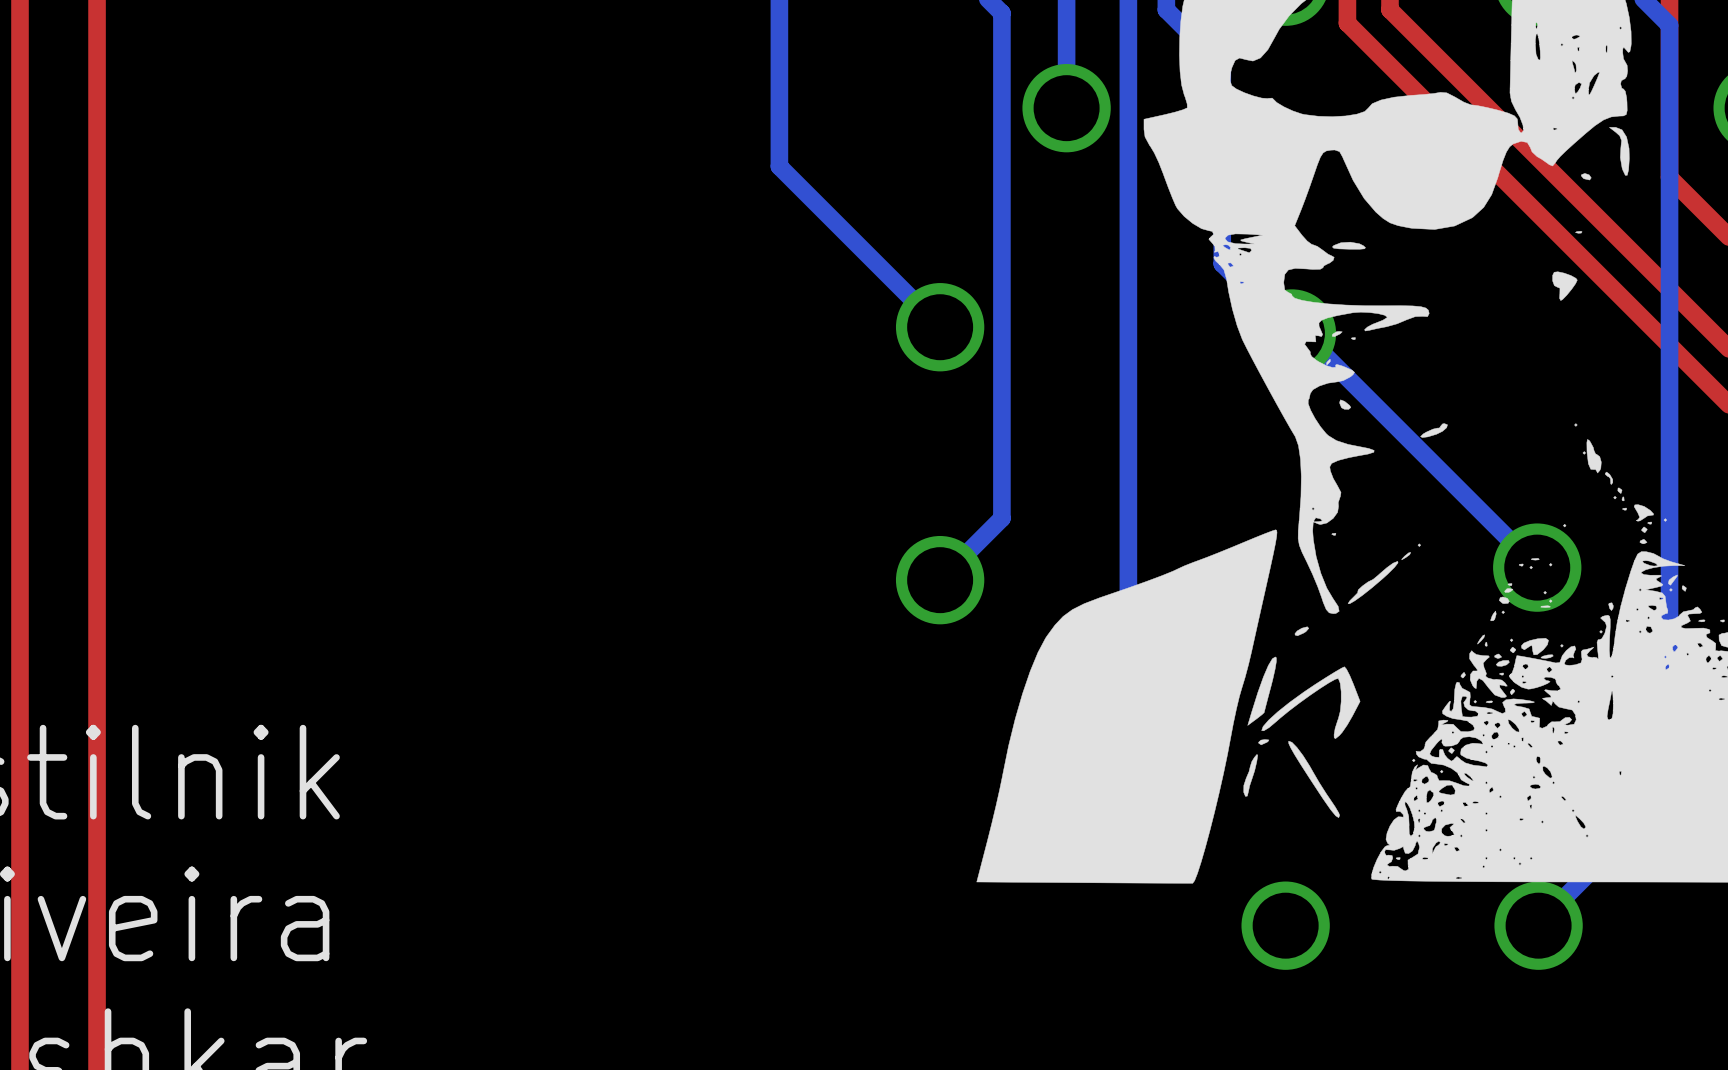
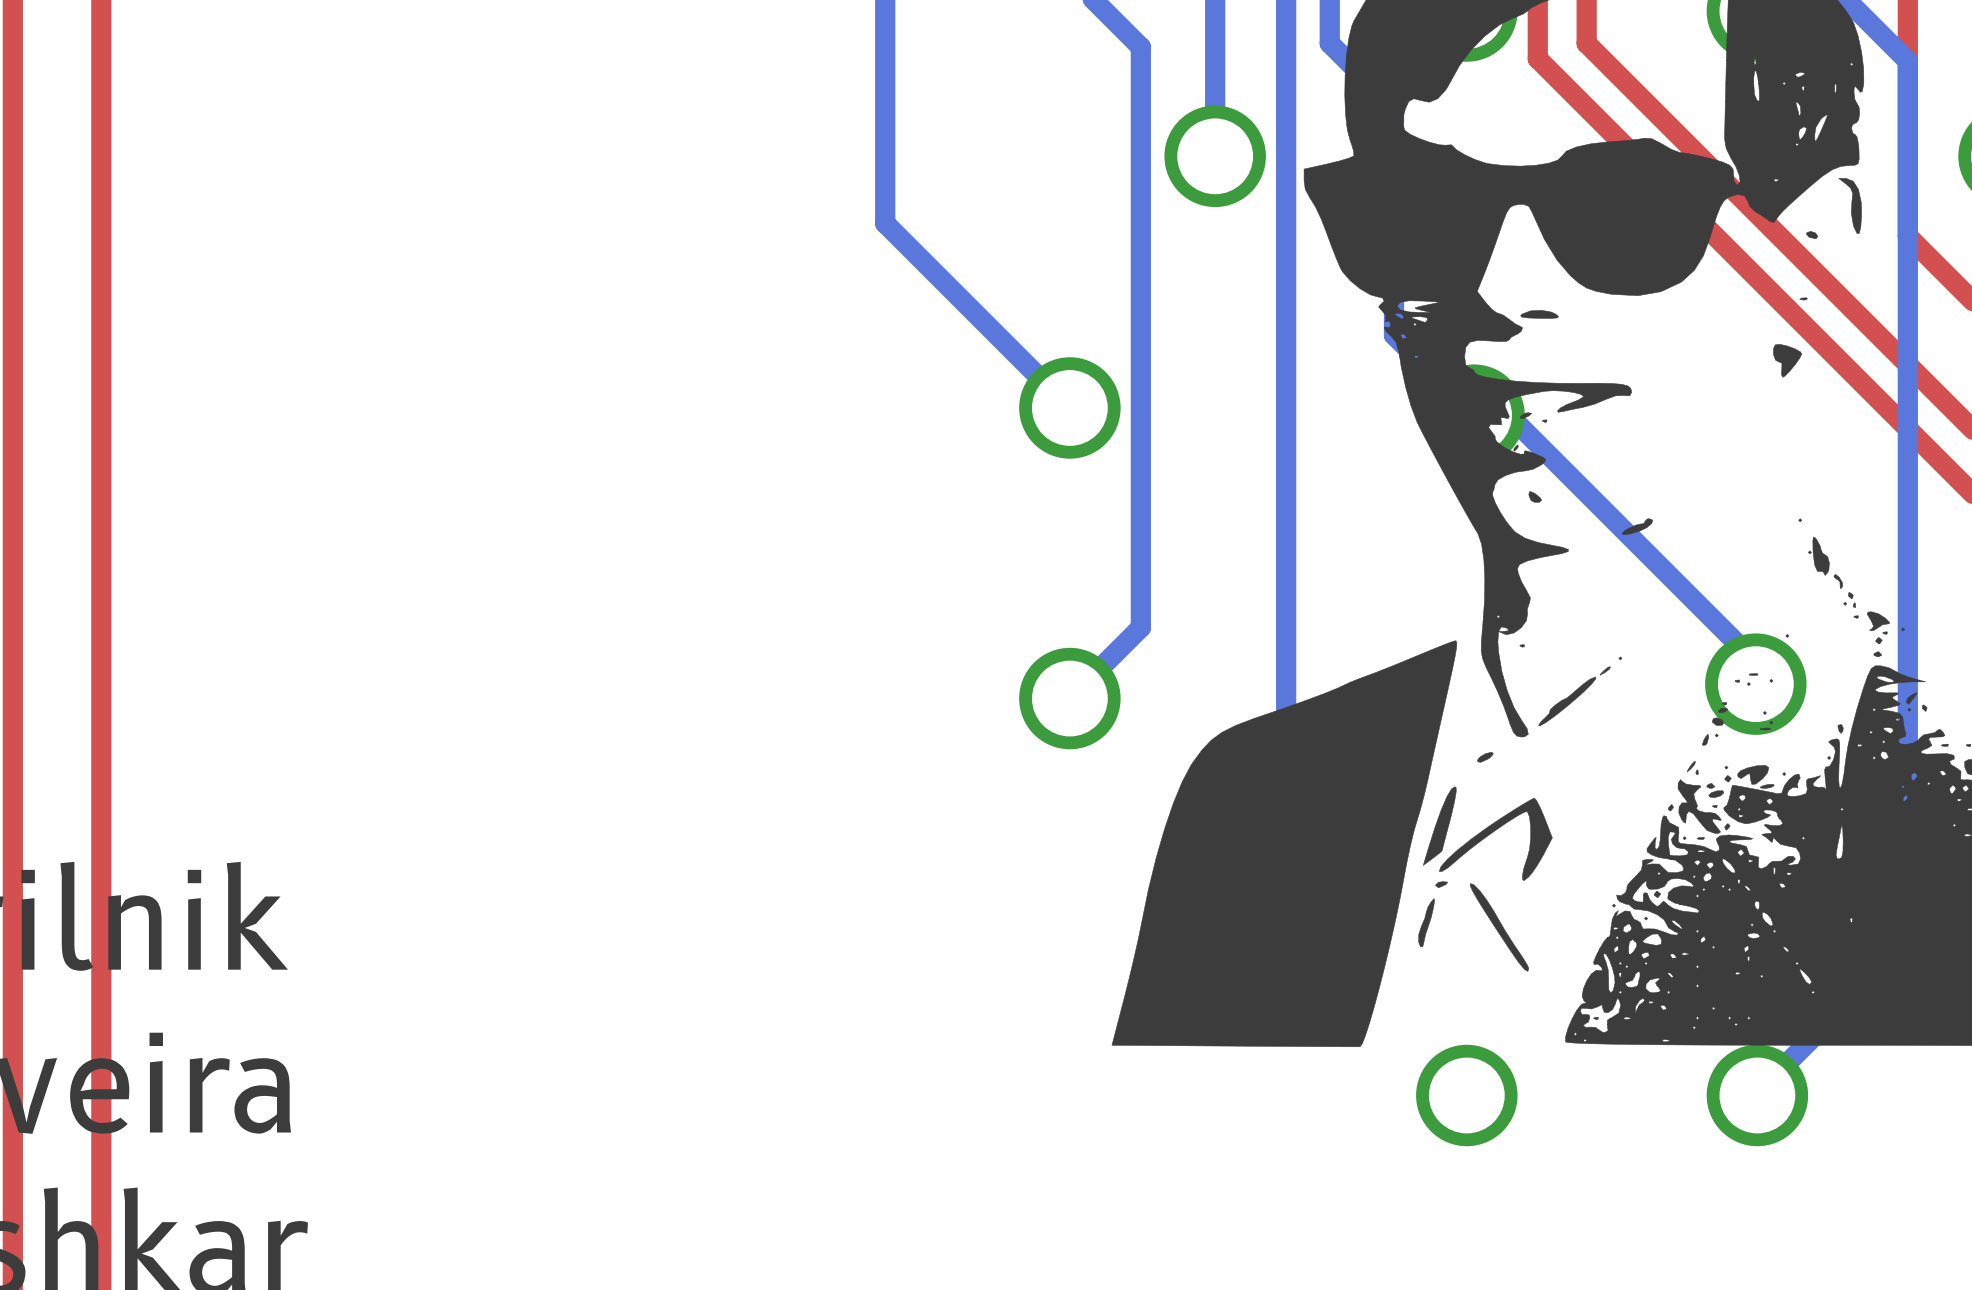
bottom track: (1303, 333) (1537, 567) -> (1486, 415) (1508, 415) (1755, 662) (1755, 684)

